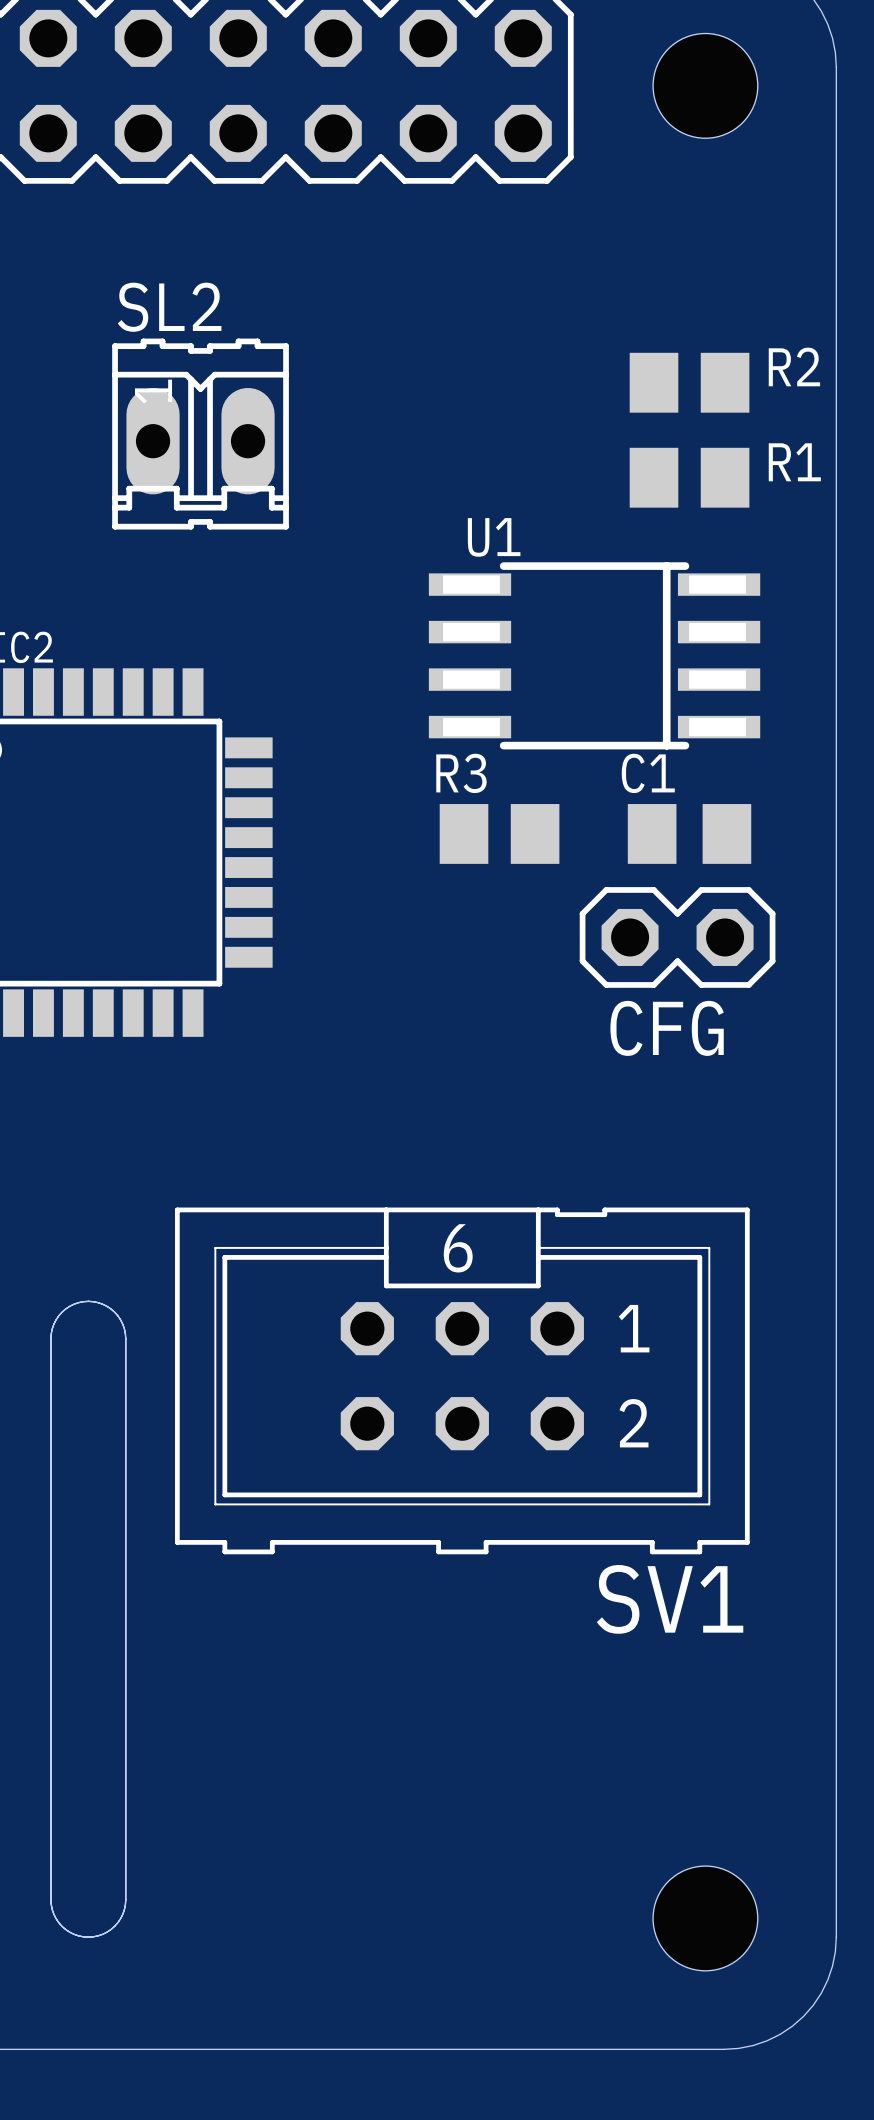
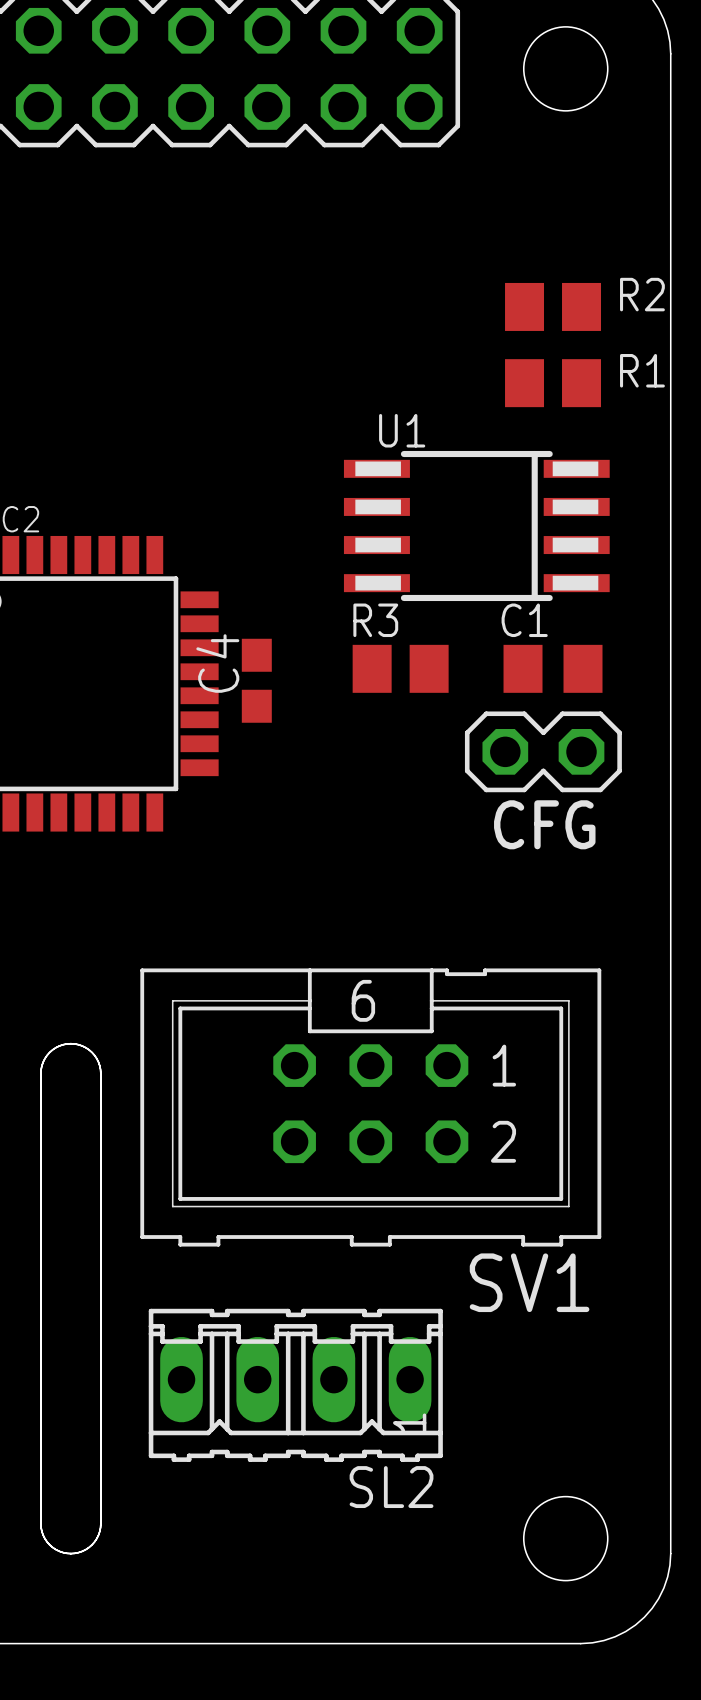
SL2 name position: SL2 (169, 307) -> SL2 (391, 1487)
SL2 footprint: [112, 338, 289, 530] -> [148, 1308, 443, 1462]
C4: none -> (256, 680)

